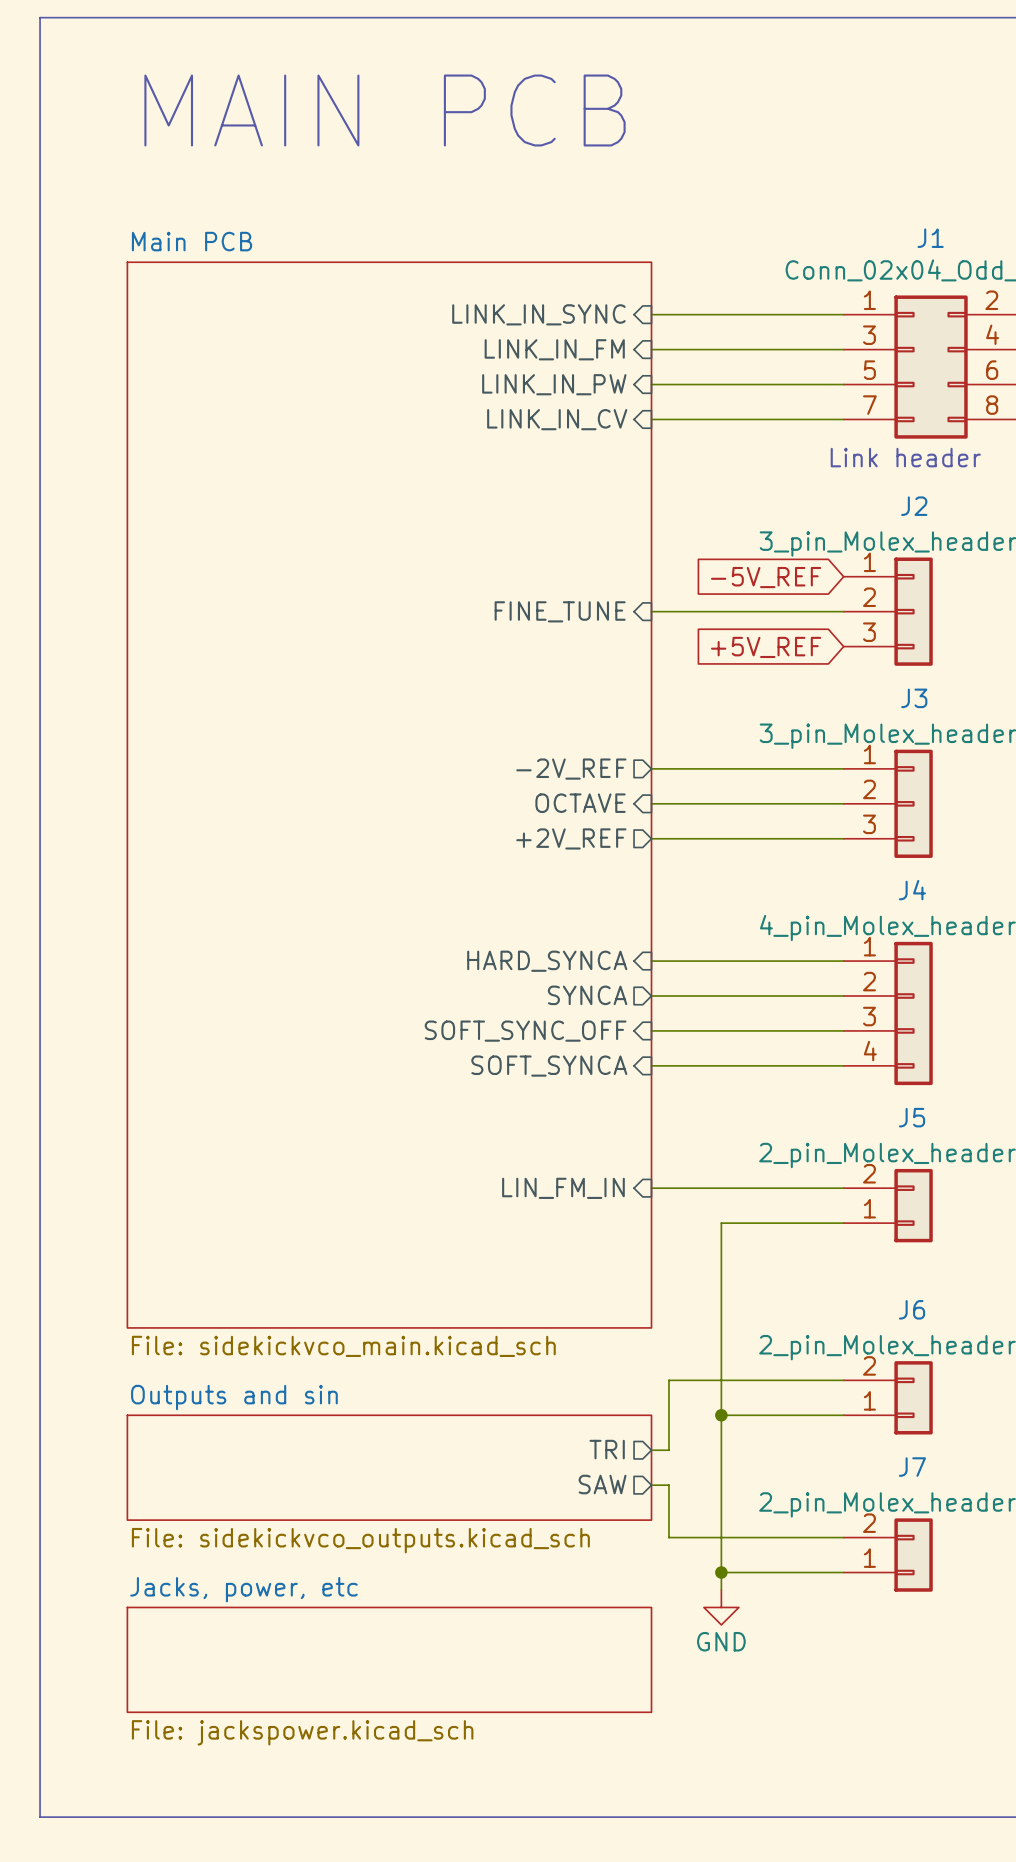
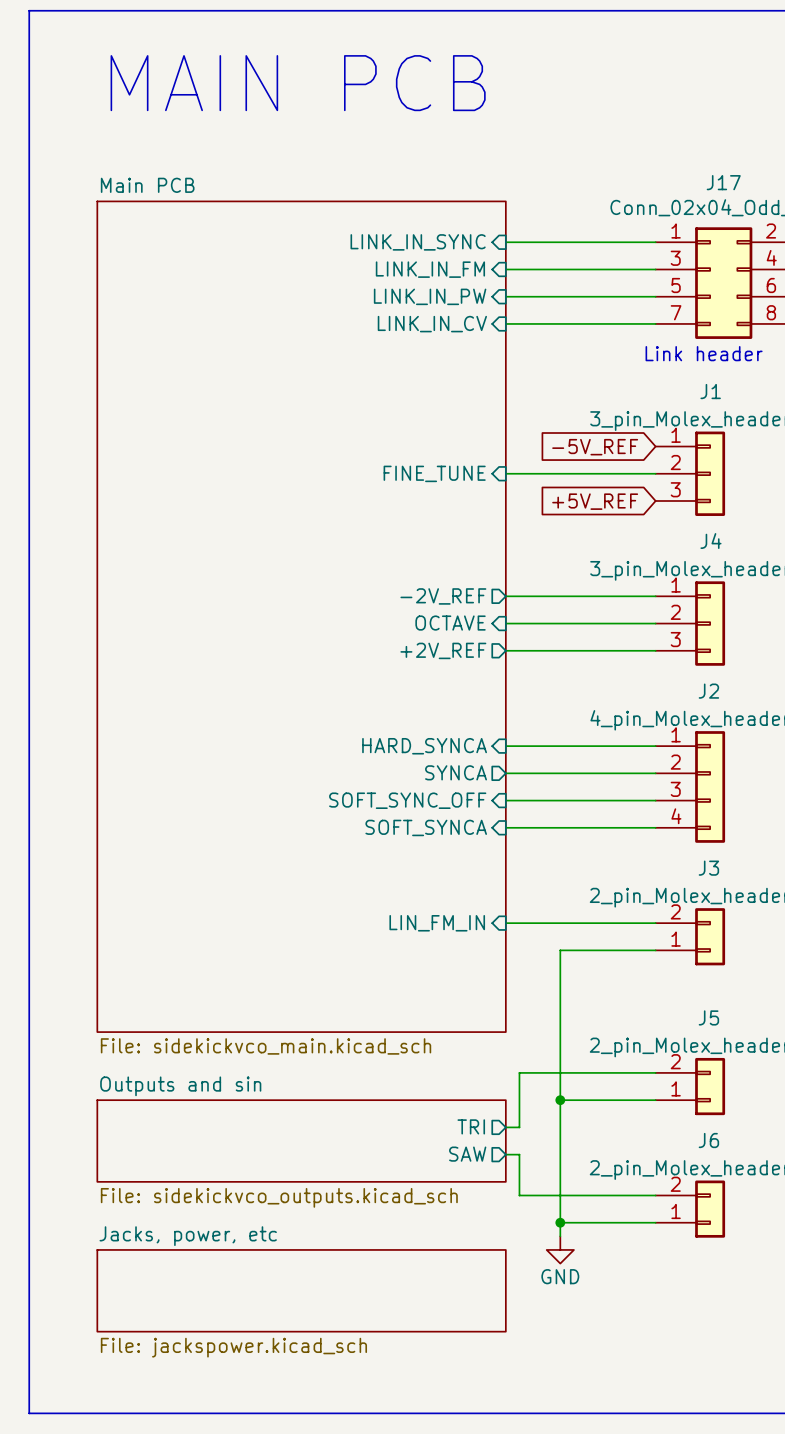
J1 name: J1 (930, 238) -> J17 (723, 182)
J2 name: J2 (914, 506) -> J1 (710, 391)
J3 name: J3 (914, 698) -> J4 (710, 541)
J4 name: J4 (912, 890) -> J2 (708, 691)
J5 name: J5 (912, 1117) -> J3 (708, 868)
J6 name: J6 (912, 1309) -> J5 (708, 1017)
J7 name: J7 (912, 1467) -> J6 (708, 1140)

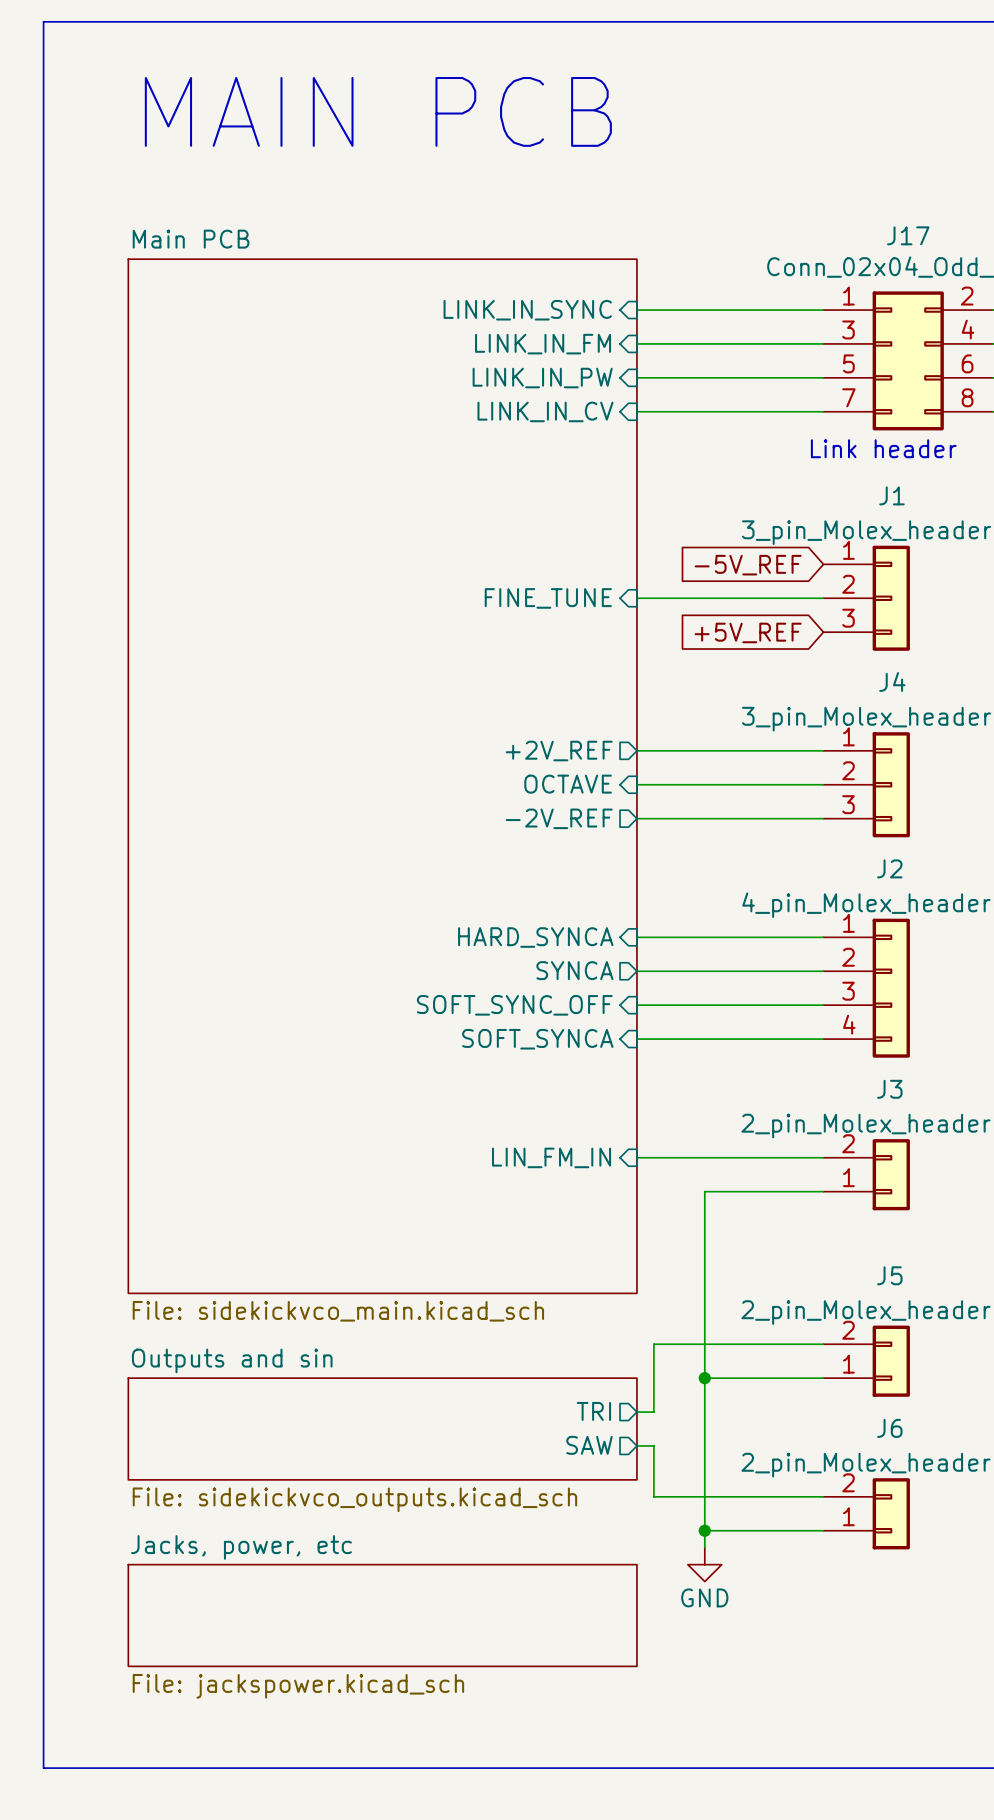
sheet pin: -2V_REF (443, 596) -> +2V_REF (559, 751)
sheet pin: +2V_REF (443, 650) -> -2V_REF (559, 818)

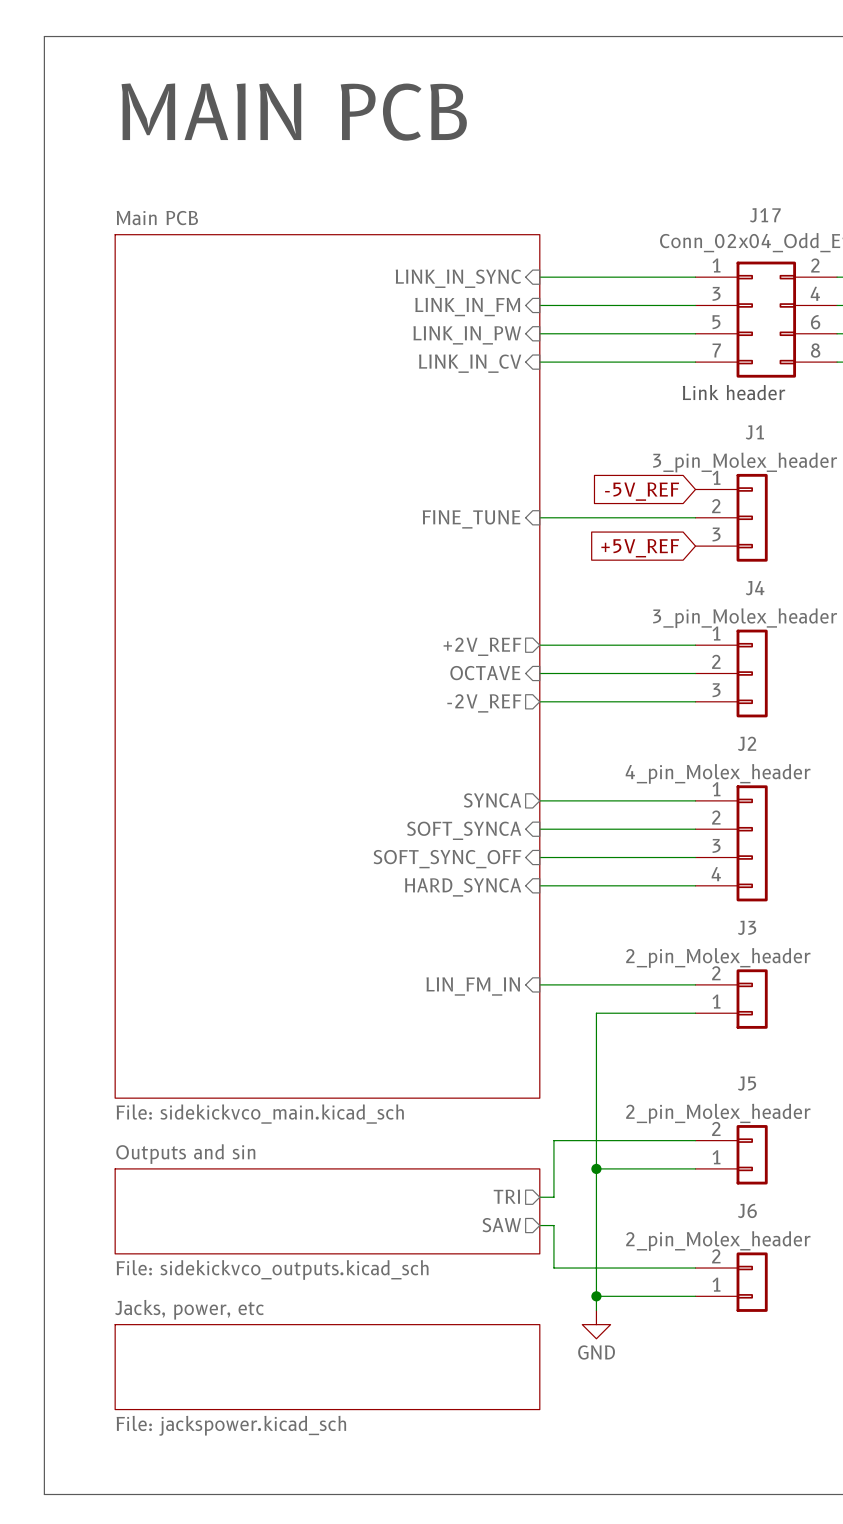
sheet pin shape: input (535, 937) -> output (492, 800)
sheet pin: HARD_SYNCA (535, 937) -> SYNCA (492, 800)
sheet pin shape: output (574, 970) -> input (464, 830)
sheet pin: SYNCA (574, 970) -> SOFT_SYNCA (464, 830)
sheet pin: SOFT_SYNCA (537, 1039) -> HARD_SYNCA (463, 887)

